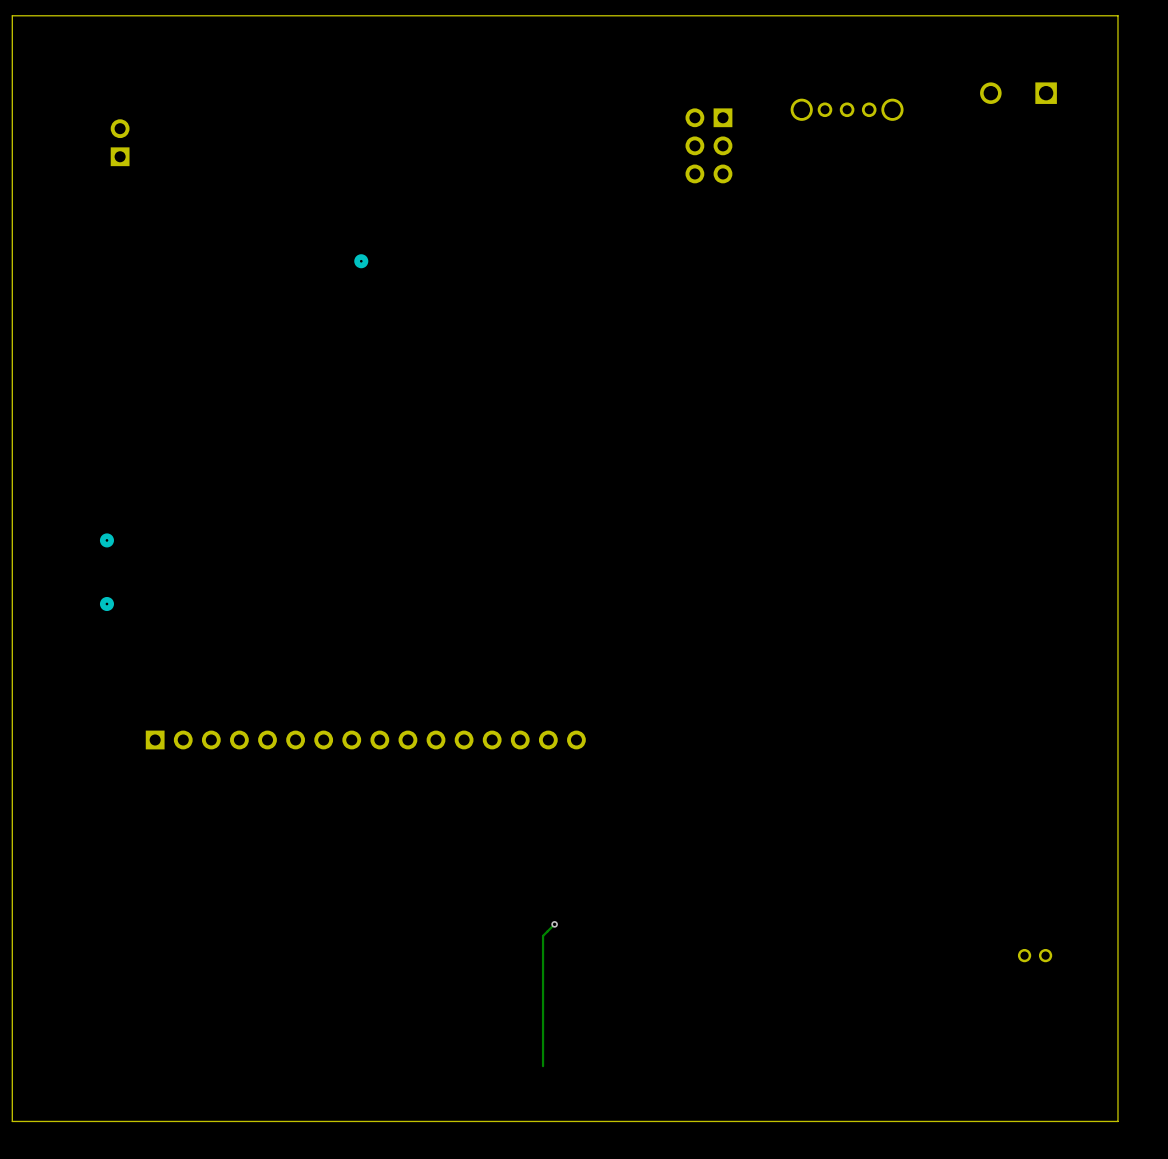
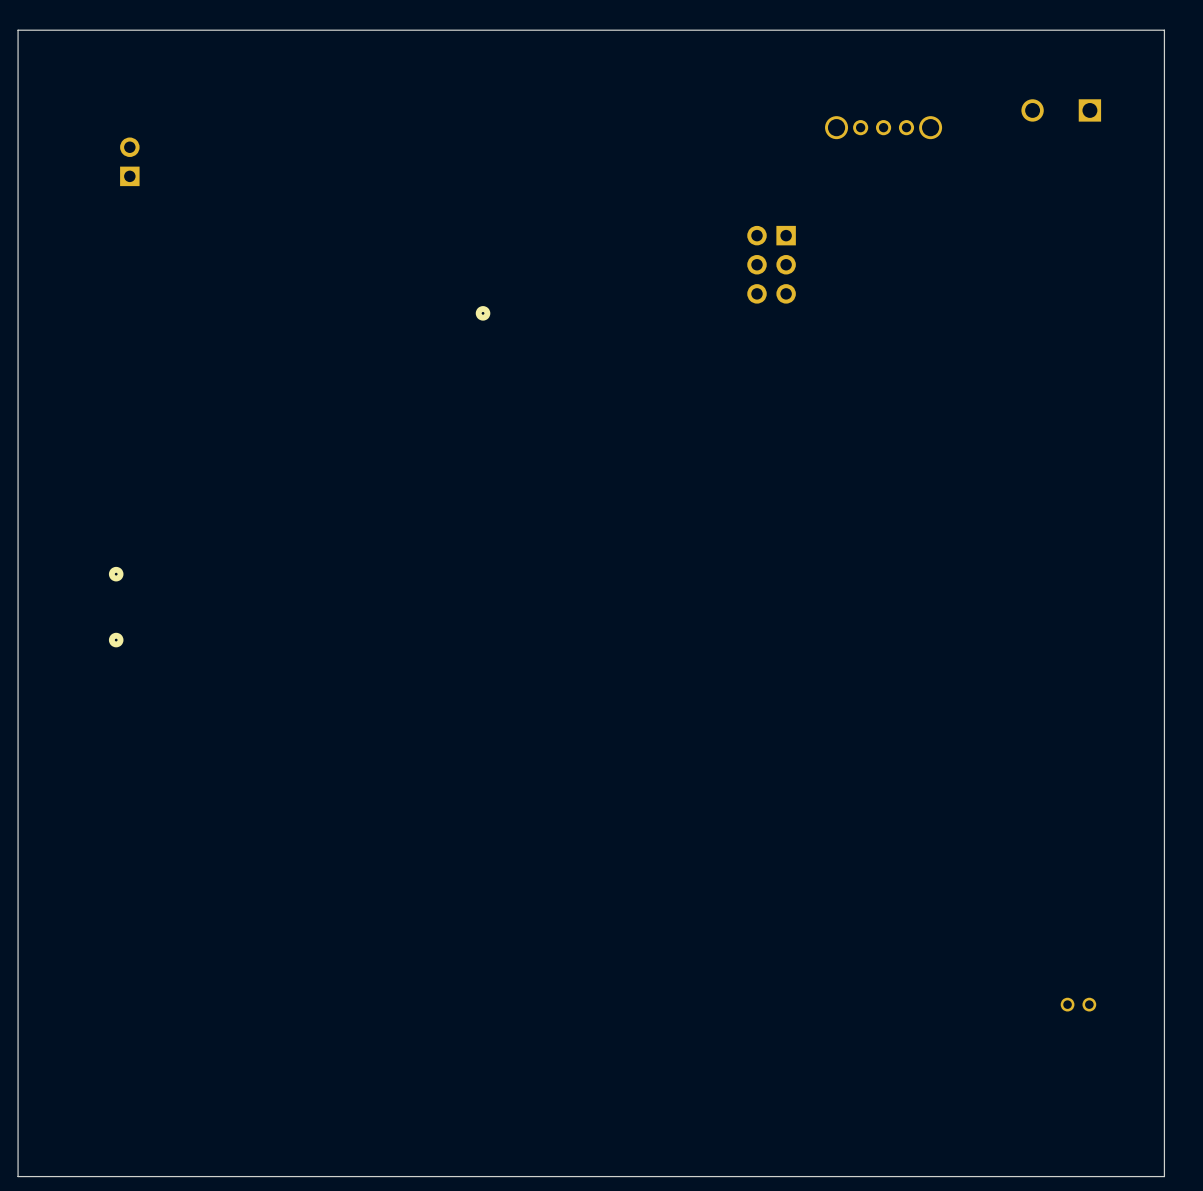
part position: (708, 145) -> (771, 264)
part position: (361, 261) -> (483, 313)
part: (365, 739) -> none
track: (554, 924) (543, 935) (543, 1066) -> none
via: (554, 924) -> none

